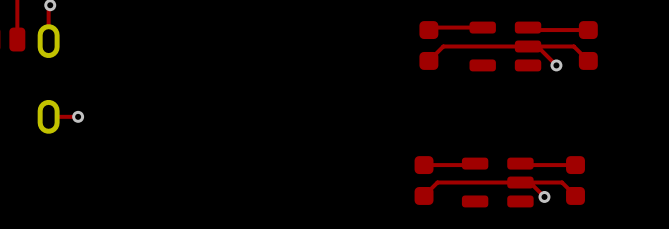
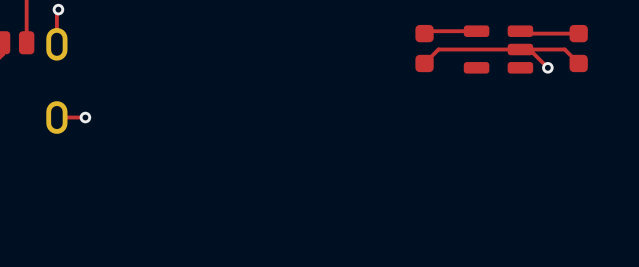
top track: (475, 163) (424, 165) -> none
top track: (520, 163) (575, 165) -> none
part: (424, 180) -> none
part: (575, 180) -> none
part: (497, 182) -> none
top track: (530, 182) (544, 196) -> none
top track: (575, 195) (562, 182) (437, 182) (424, 195) -> none
via: (544, 196) -> none

